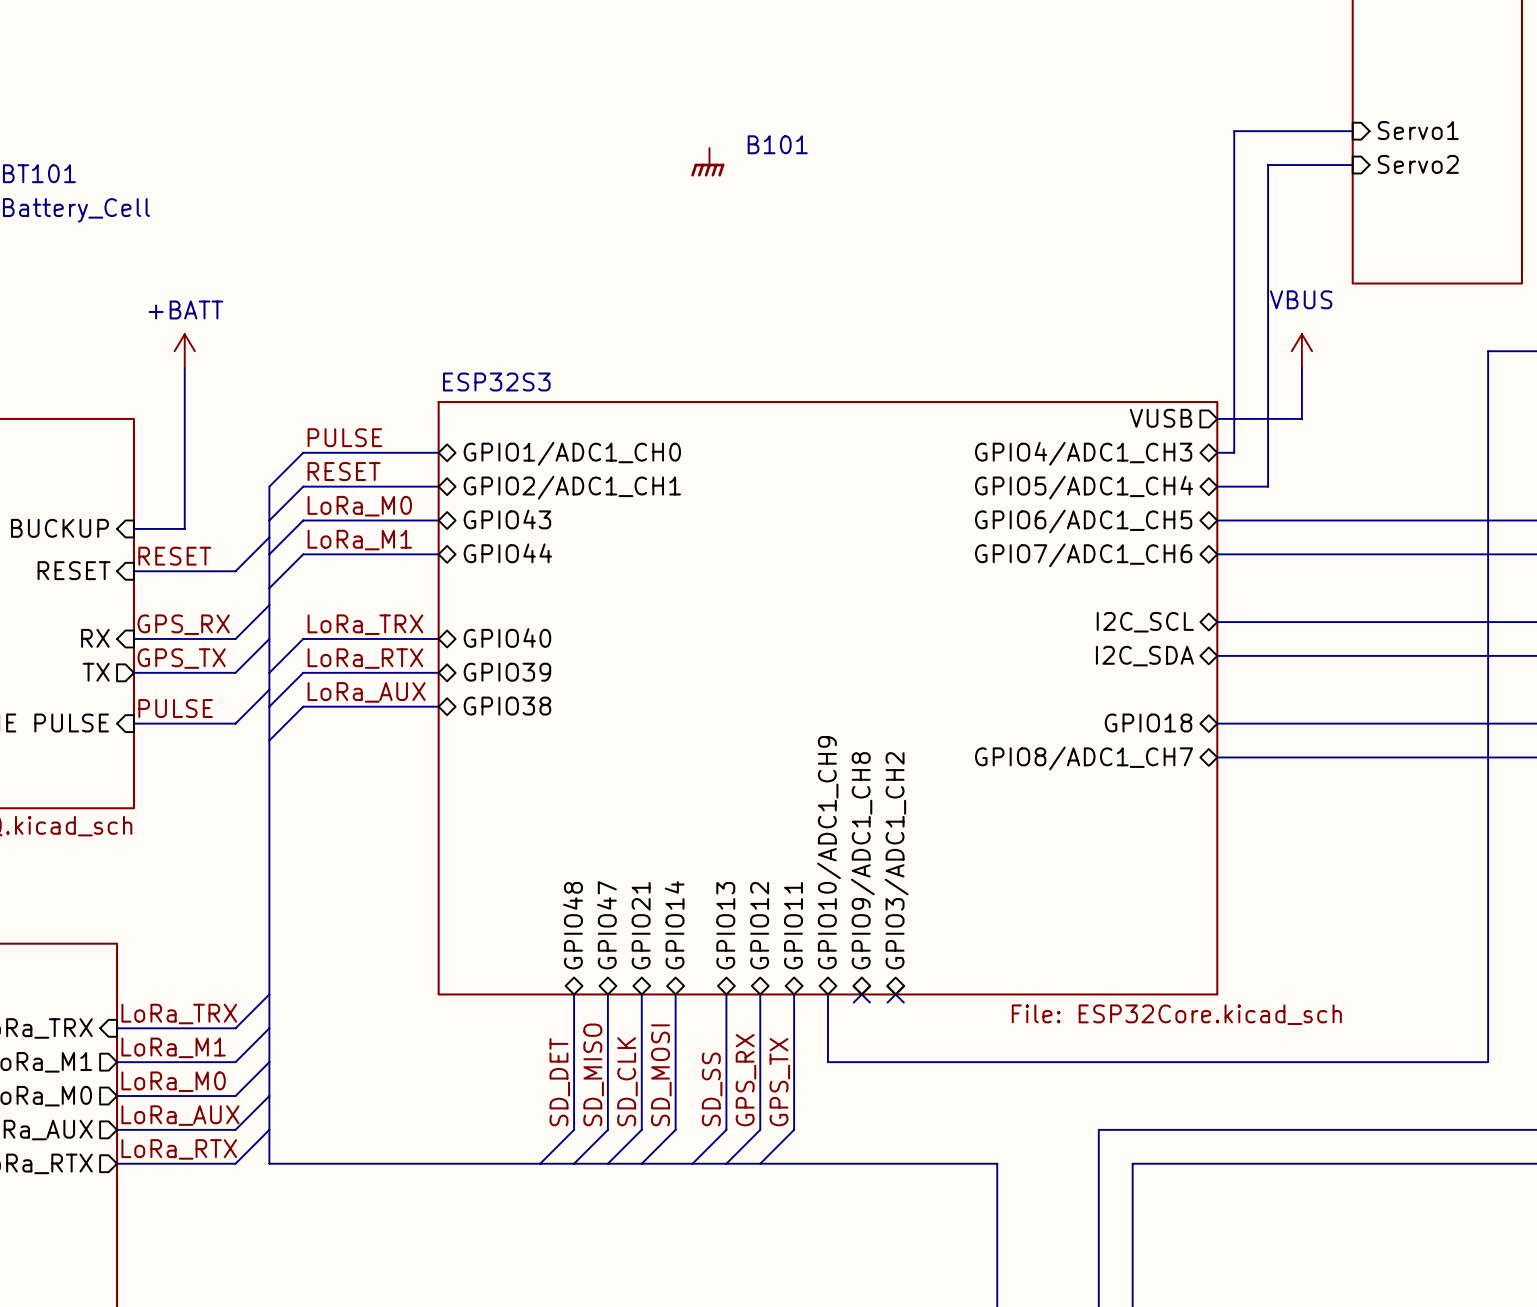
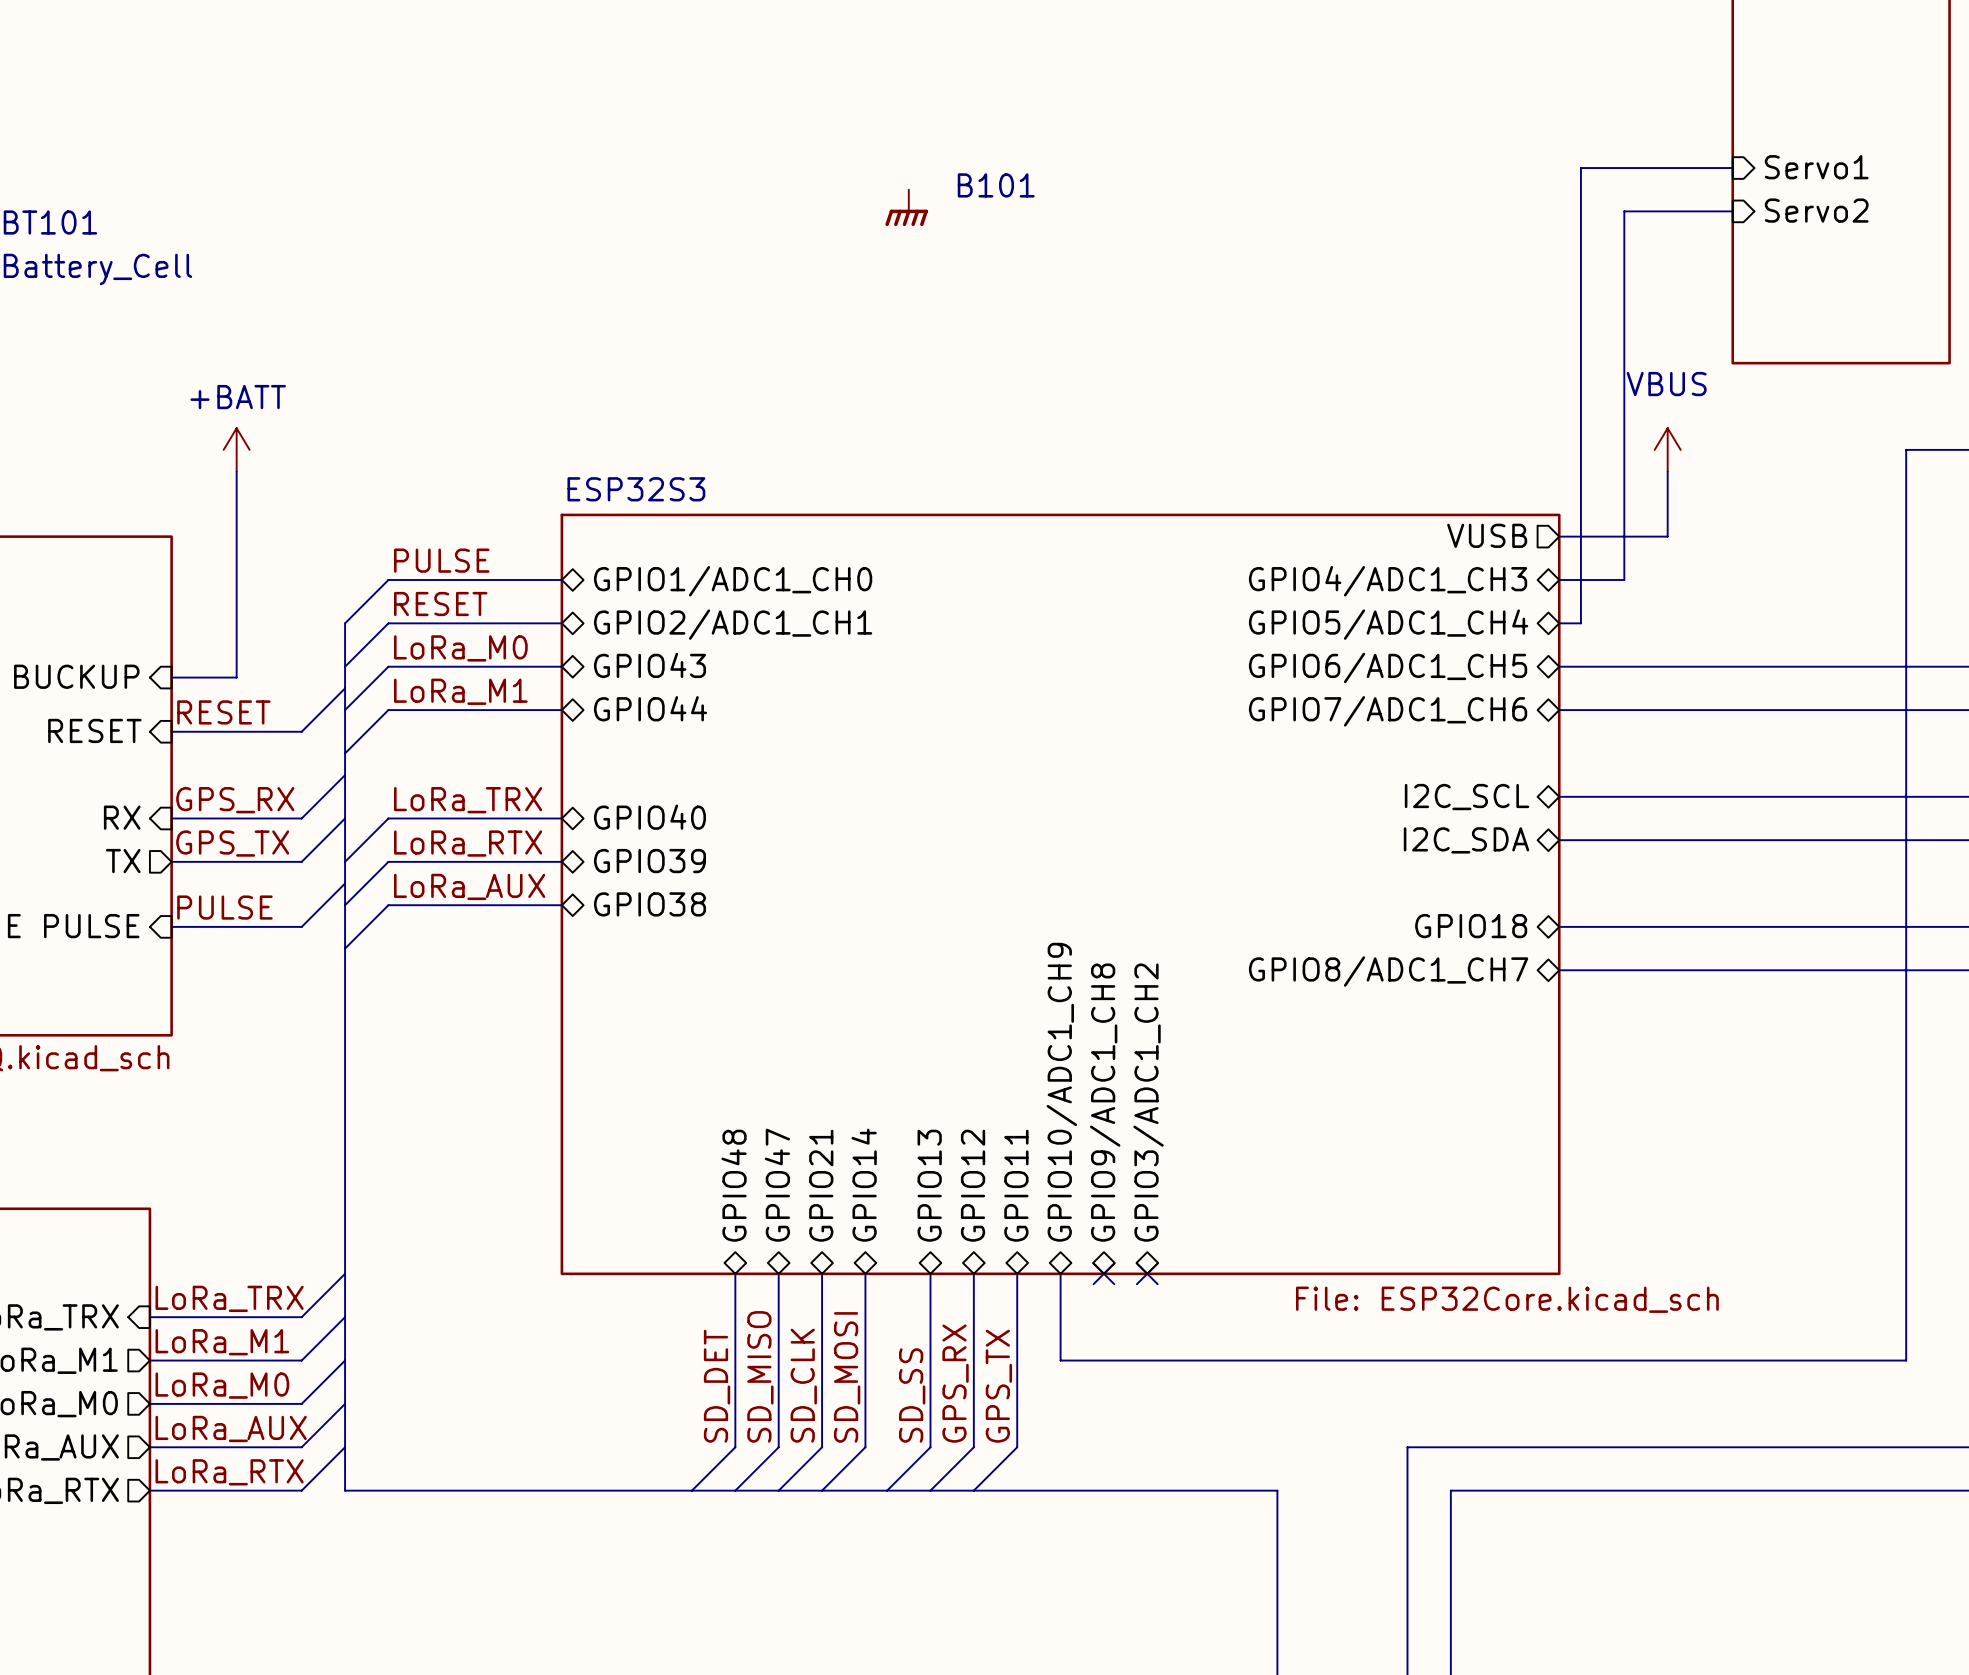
wire: (1268, 452) (1268, 486) (1234, 486) -> (1624, 579) (1580, 579) (1580, 623)

